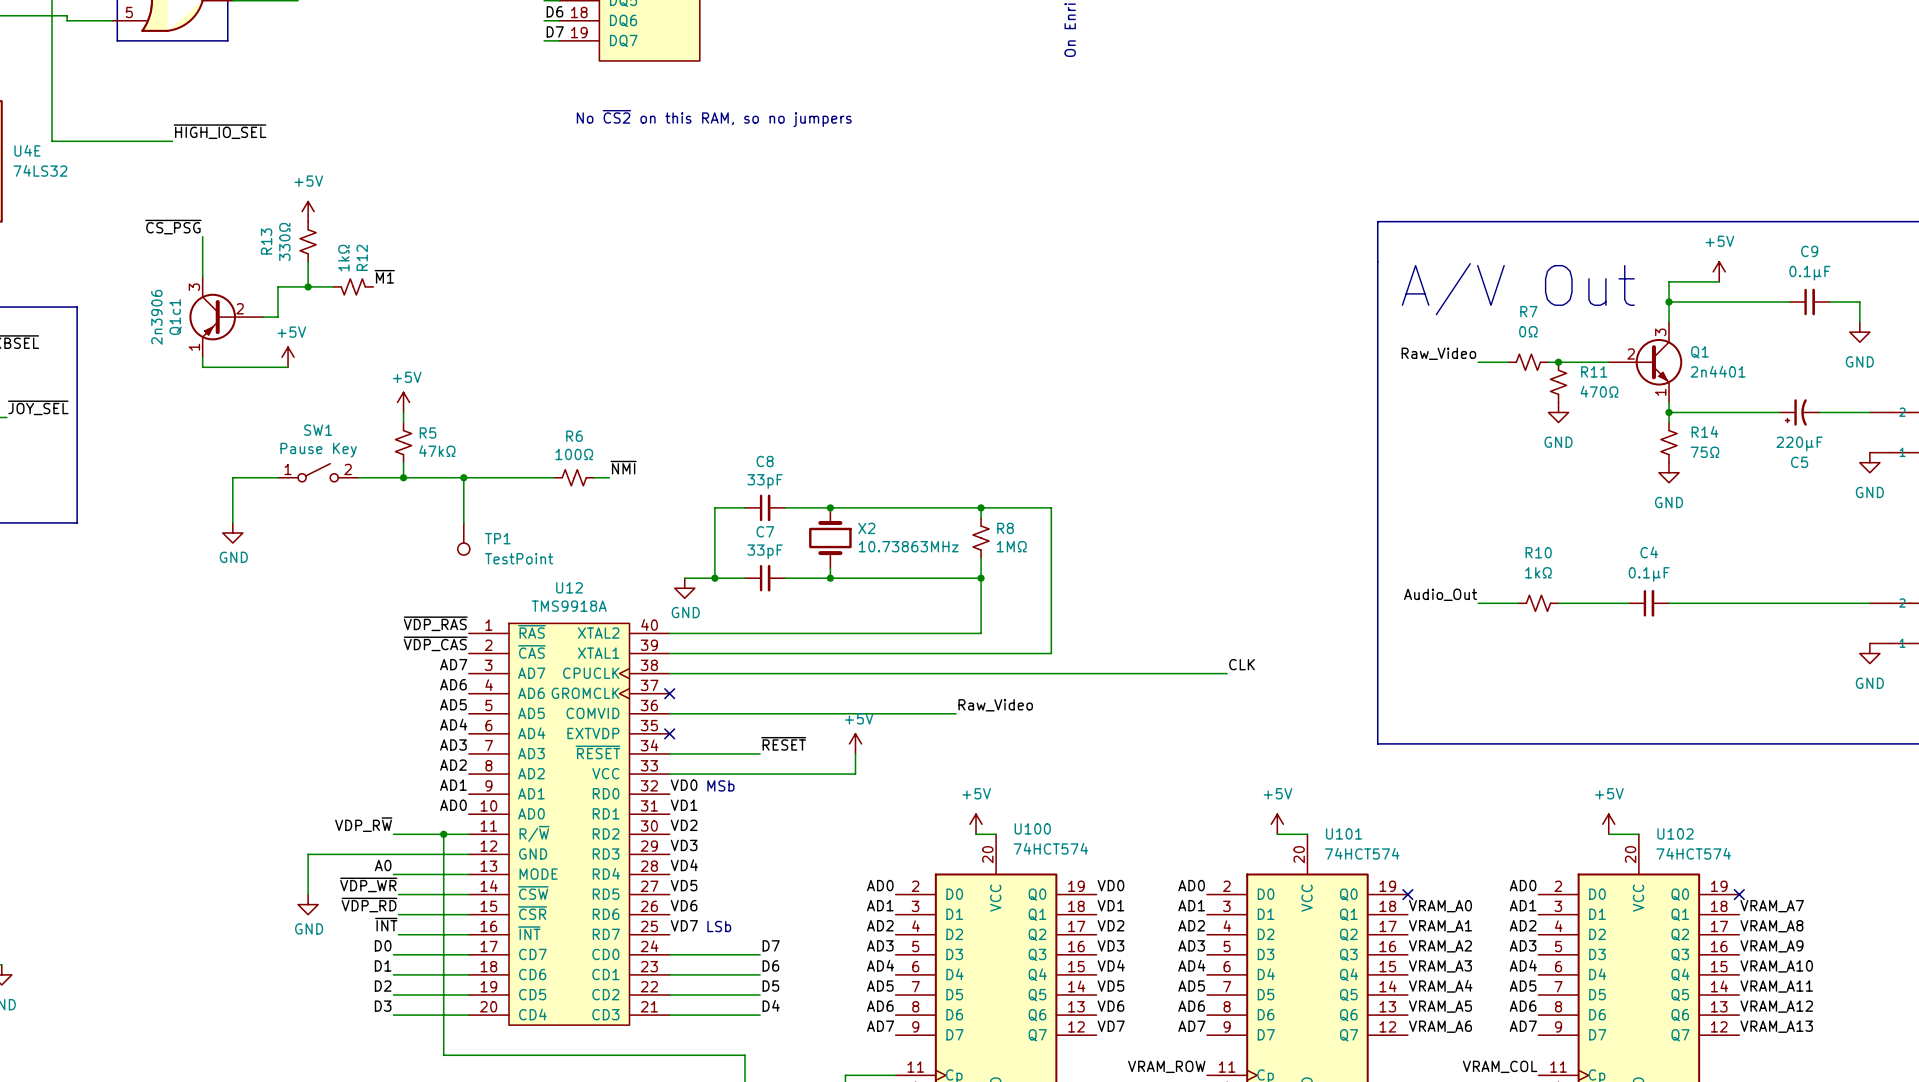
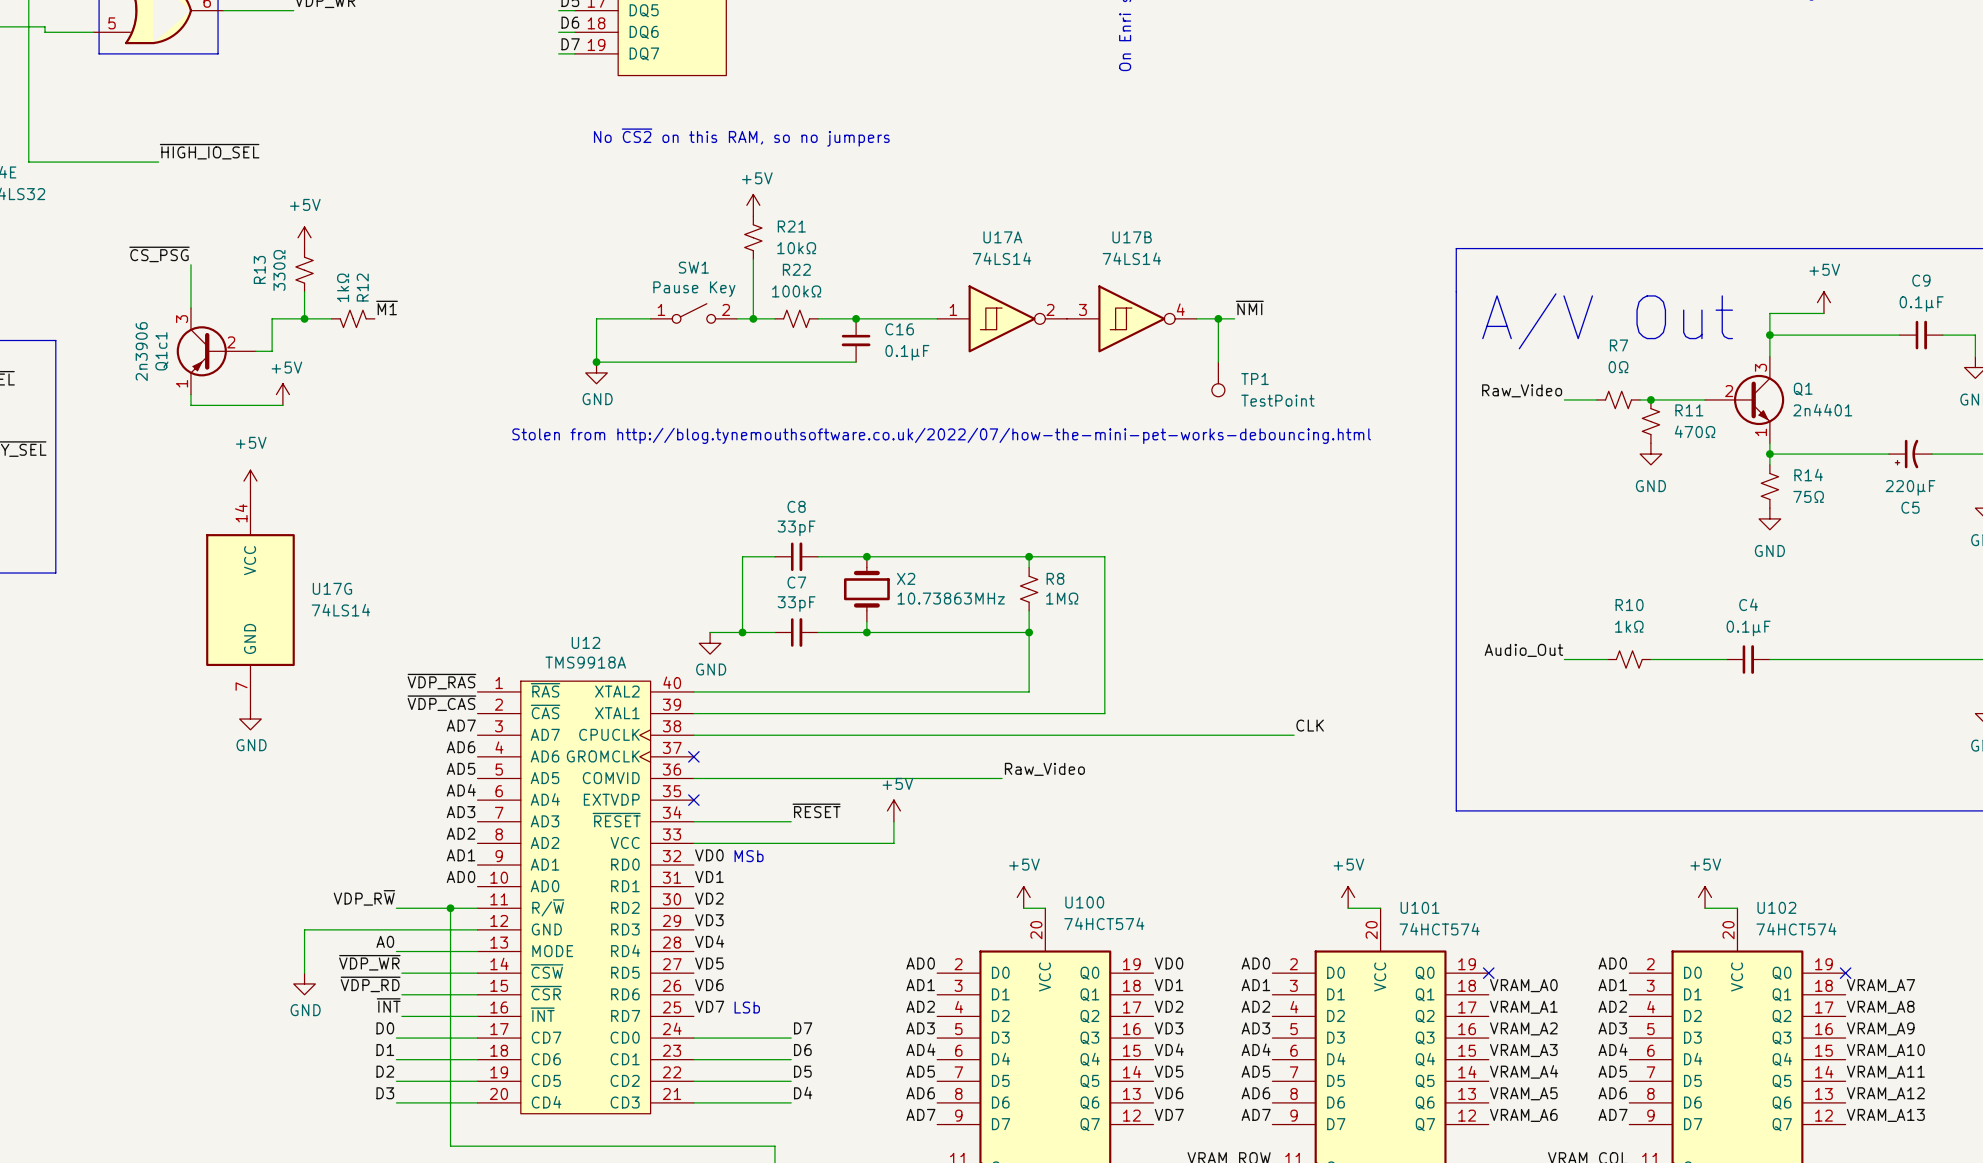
power symbol: none -> +5V (753, 205)
R21: none -> 10kΩ (753, 237)
wire: none -> (753, 259) (753, 318)
label: none -> ~{NMI} (1249, 307)
wire: none -> (650, 318) (596, 318) (596, 362) (856, 362)
wire: none -> (737, 318) (774, 318)
junction: none -> (753, 318)
R22: none -> 100kΩ (796, 318)
wire: none -> (818, 318) (937, 318)
junction: none -> (856, 318)
U17A: none -> 74LS14 (1002, 318)
U17B: none -> 74LS14 (1131, 318)
wire: none -> (1196, 318) (1234, 318)
wire: none -> (1218, 318) (1218, 362)
junction: none -> (1218, 318)
C16: none -> 0.1µF (856, 340)
junction: none -> (596, 362)
power symbol: none -> GND (596, 372)
power symbol text position: +5V (407, 377) -> +5V (251, 442)
text: none -> Stolen from http://blog.tynemouthsoftware.co.uk/2022/07/how-the-mini-pet-works-debouncing.html (941, 435)
power symbol position: +5V (403, 402) -> +5V (250, 481)
wire: (403, 412) (403, 422) -> none
R5: 47kΩ (403, 442) -> none
wire: (403, 462) (403, 477) -> none
label: ~{NMI} (623, 467) -> none
SW1 position: (318, 472) -> (693, 313)
wire: (277, 477) (232, 477) (232, 522) -> none
wire: (358, 477) (554, 477) -> none
junction: (403, 477) -> none
wire: (463, 477) (463, 522) -> none
junction: (463, 477) -> none
R6: 100Ω (574, 477) -> none
wire: (594, 477) (609, 477) -> none
power symbol position: GND (232, 533) -> GND (250, 719)
TP1 position: (463, 539) -> (1218, 379)
U17G: none -> 74LS14 (250, 600)

